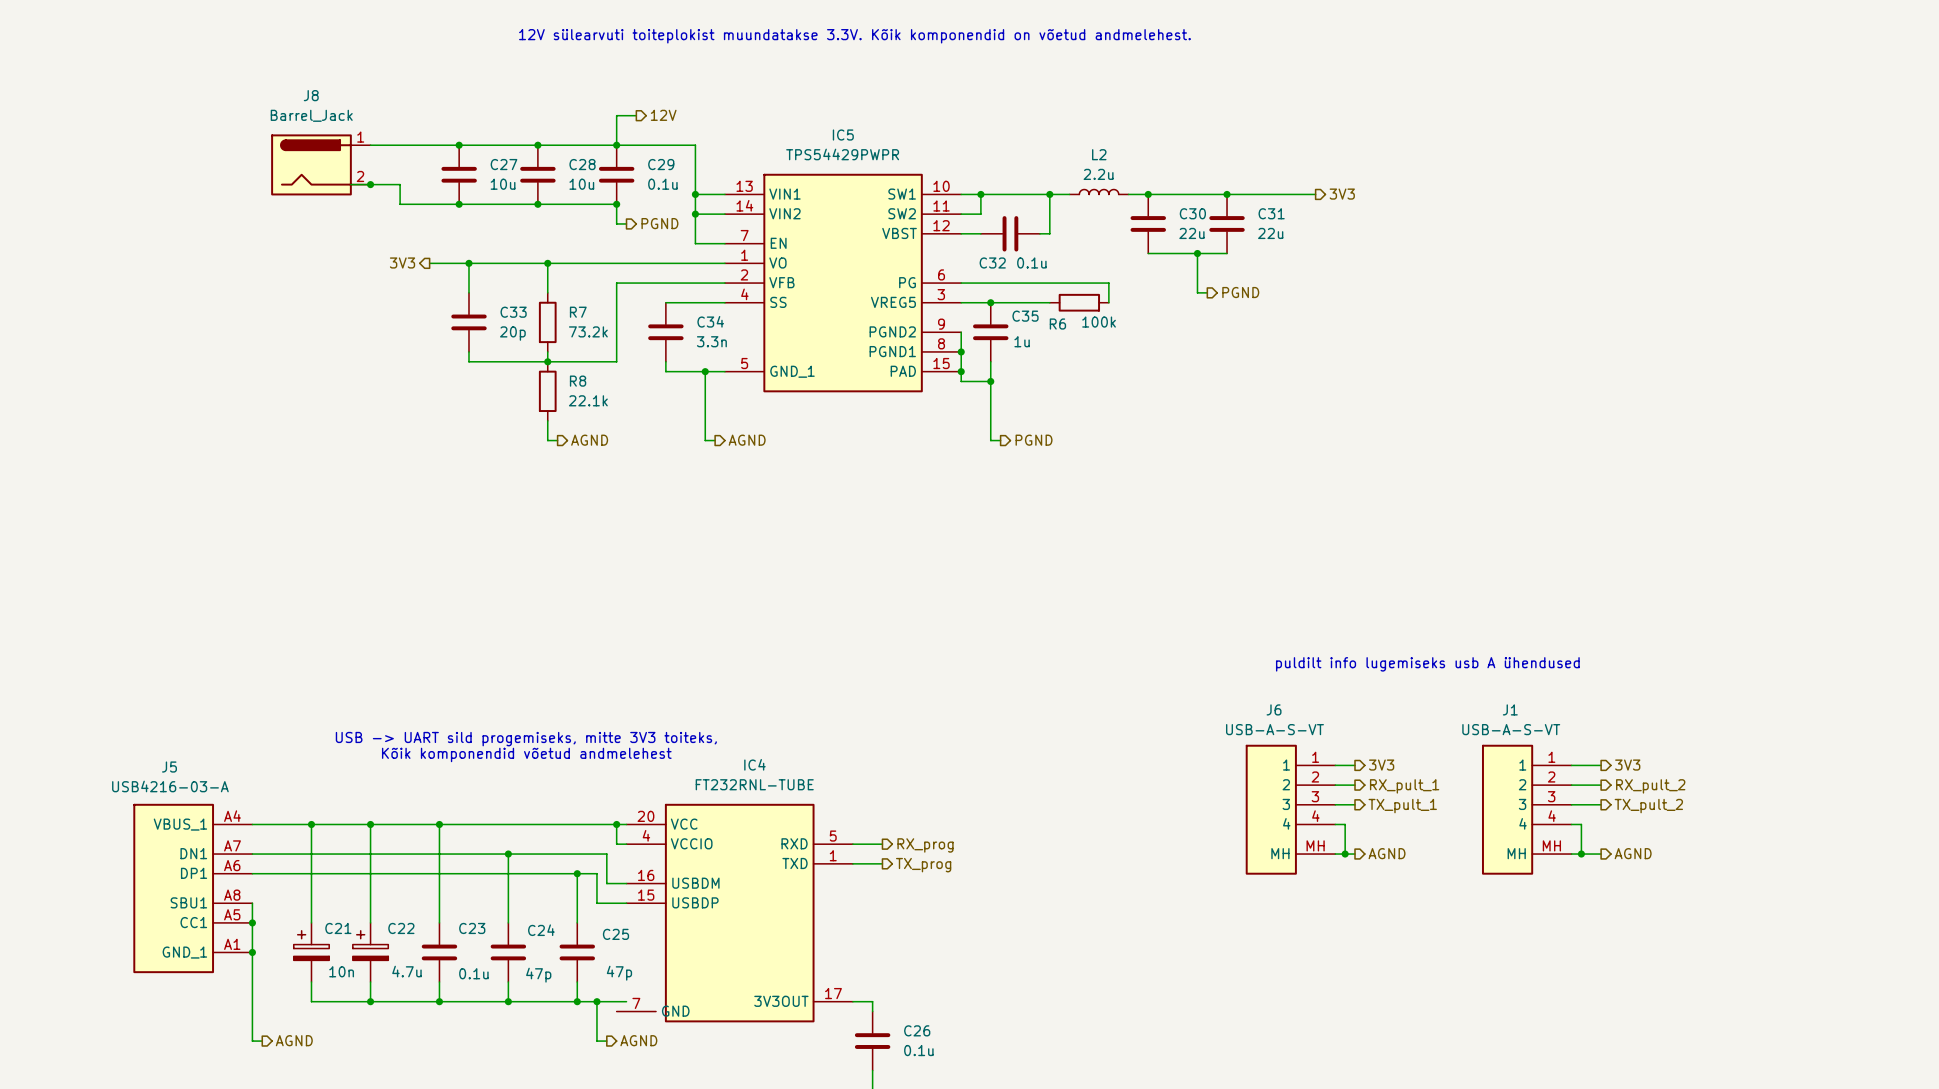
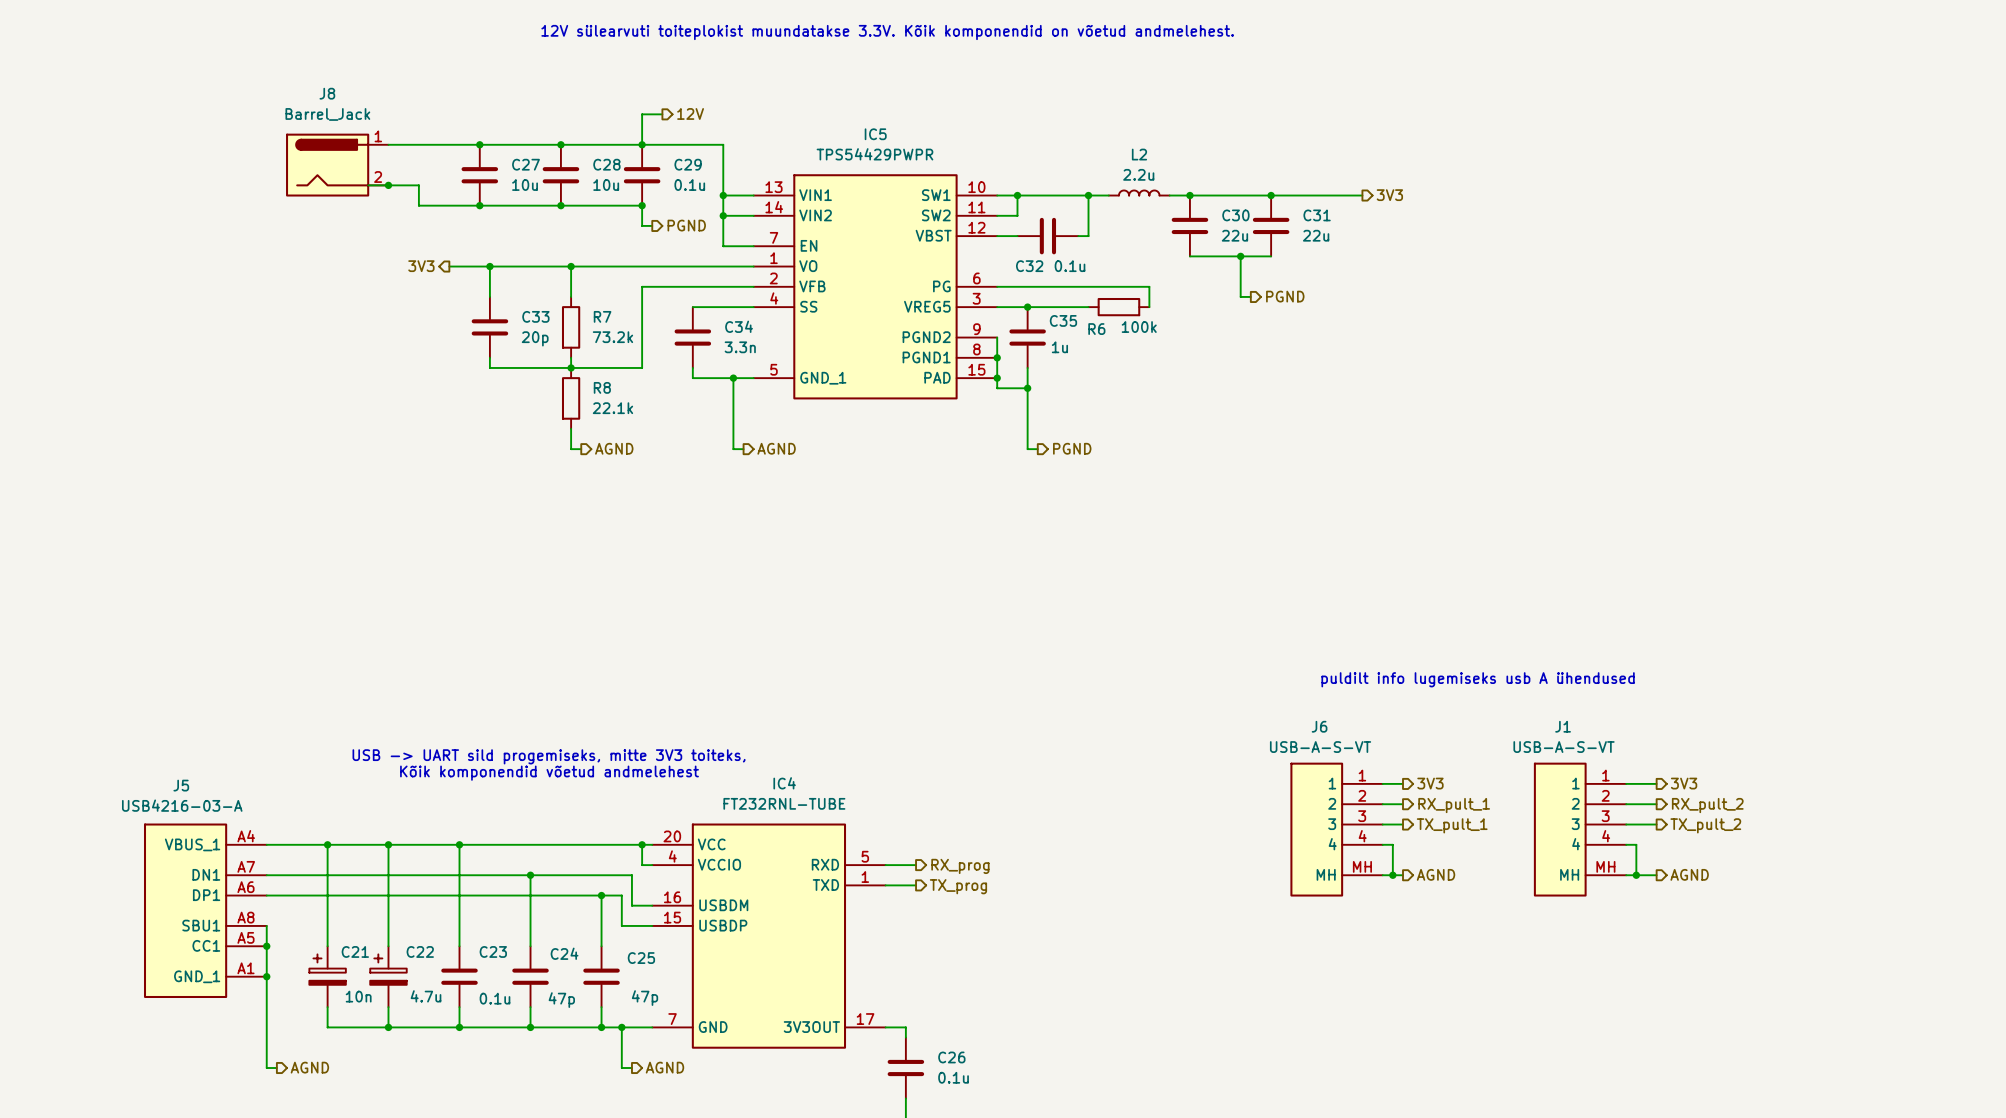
IC4 symbol: [616, 803, 853, 1023] -> [652, 823, 886, 1049]

